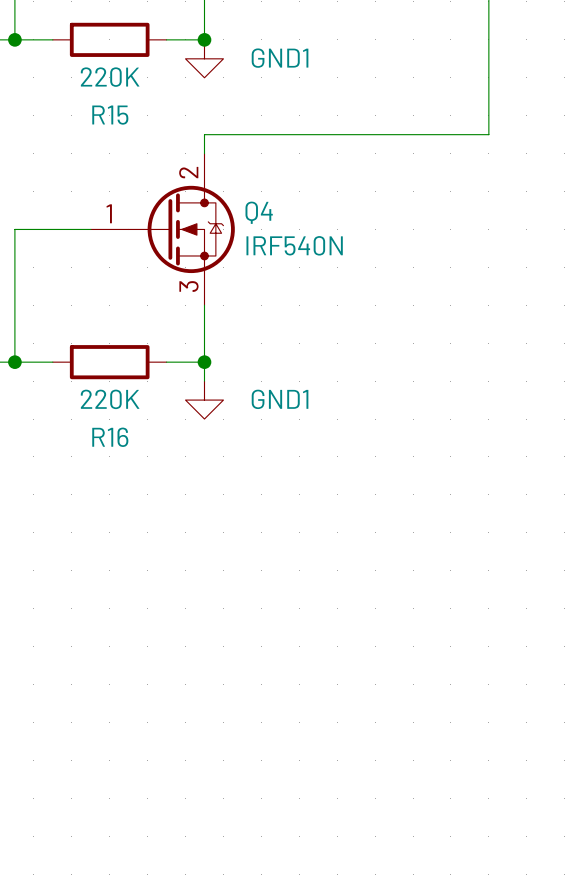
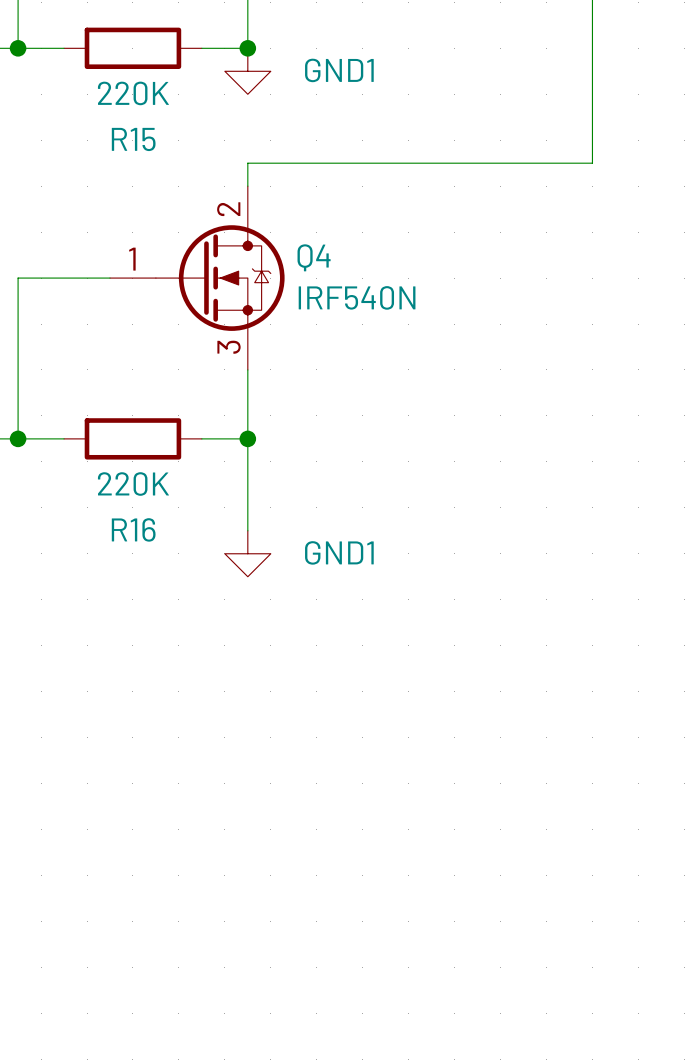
wire: none -> (247, 461) (247, 530)
power symbol position: GND1 (204, 400) -> GND1 (247, 553)

